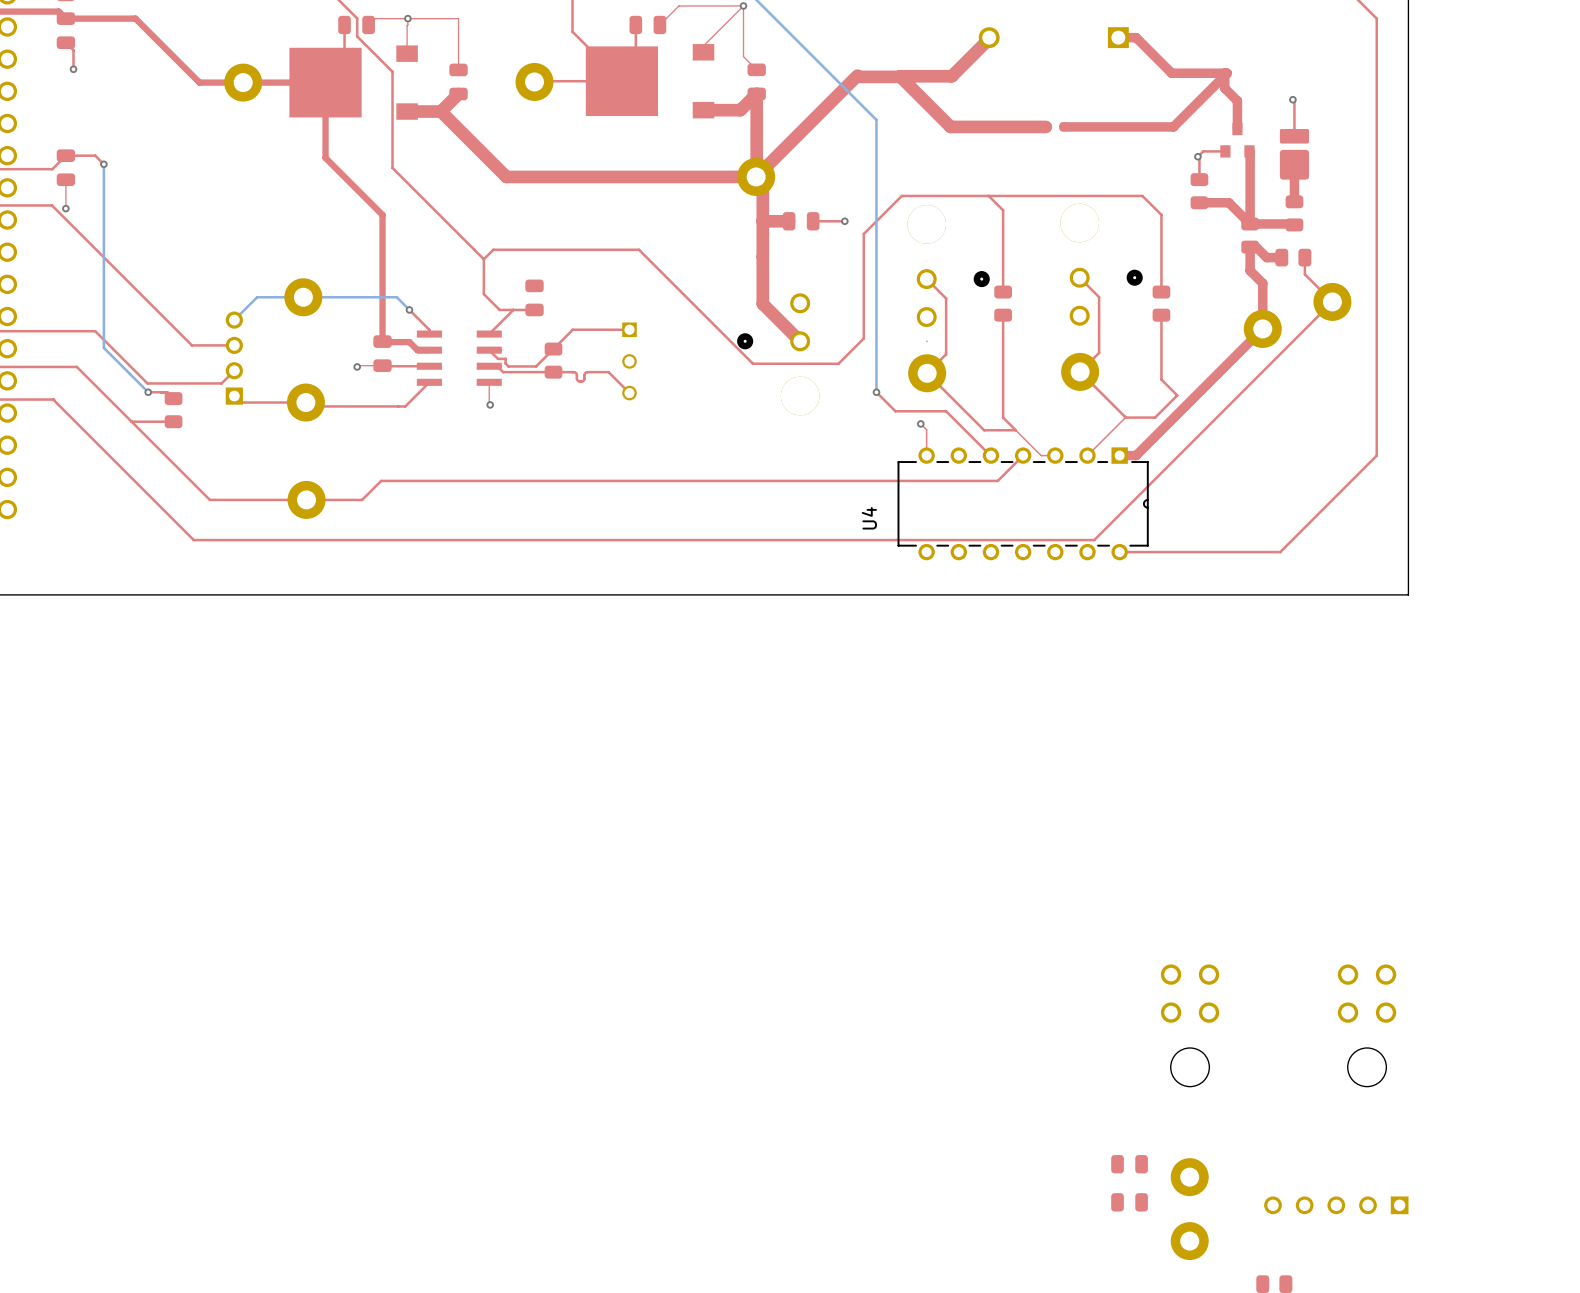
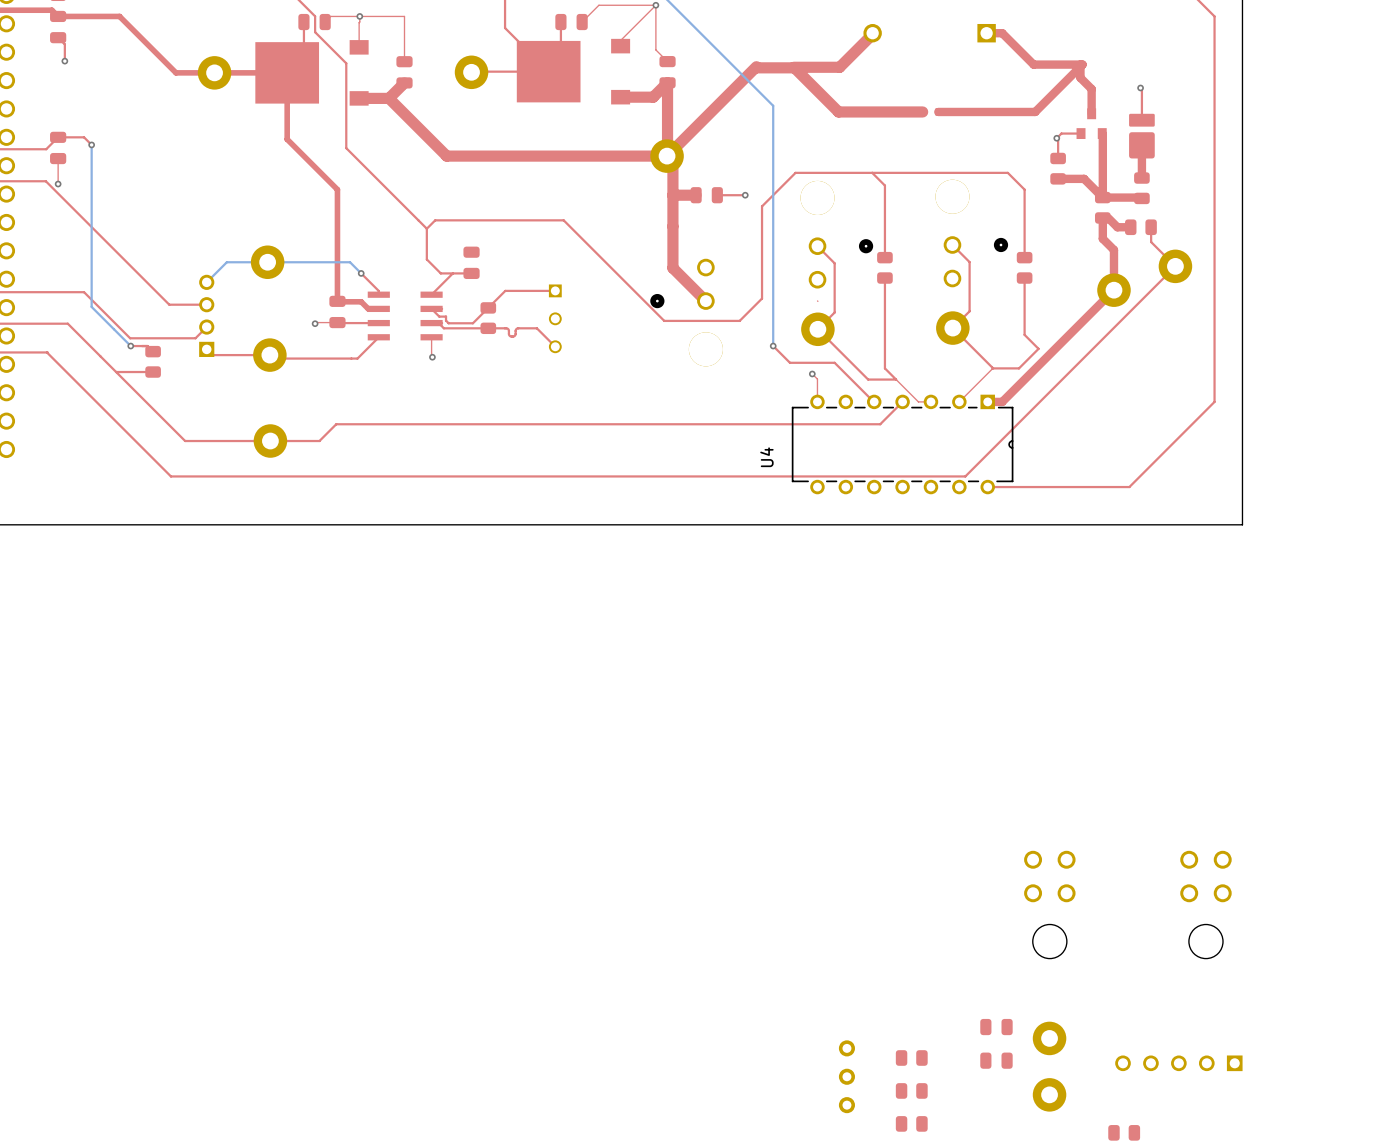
part: none -> (911, 1057)
part: none -> (846, 1076)
part: none -> (911, 1090)
part: none -> (911, 1123)

